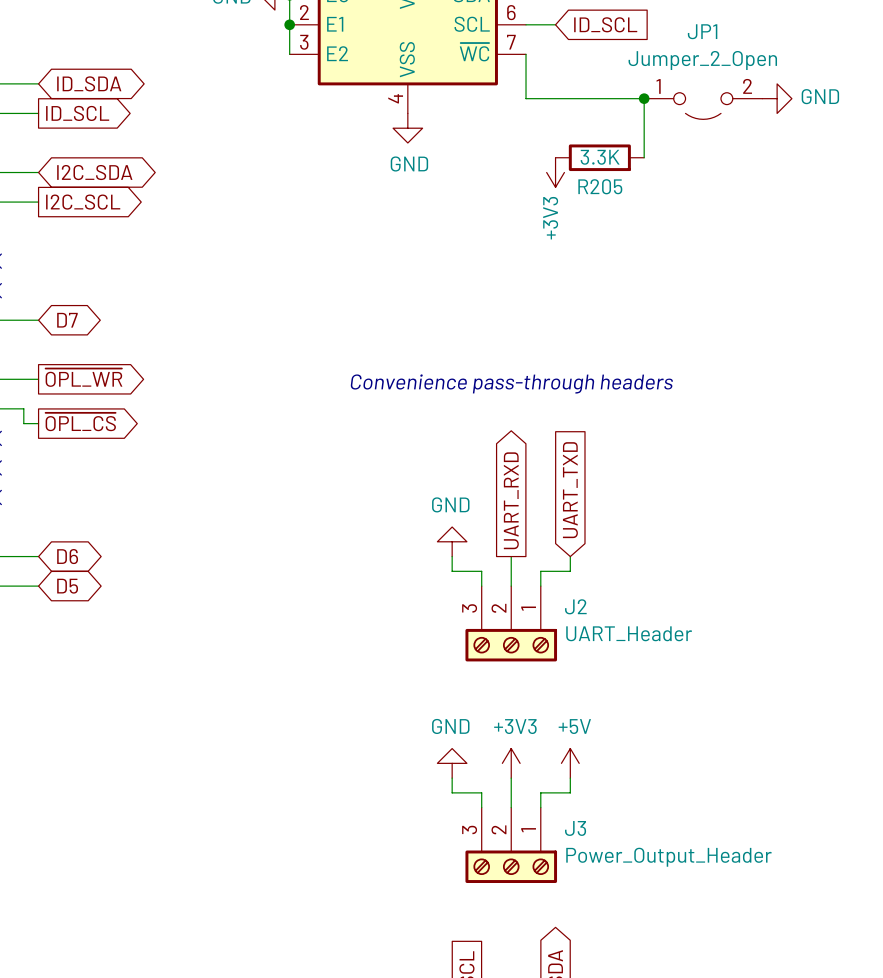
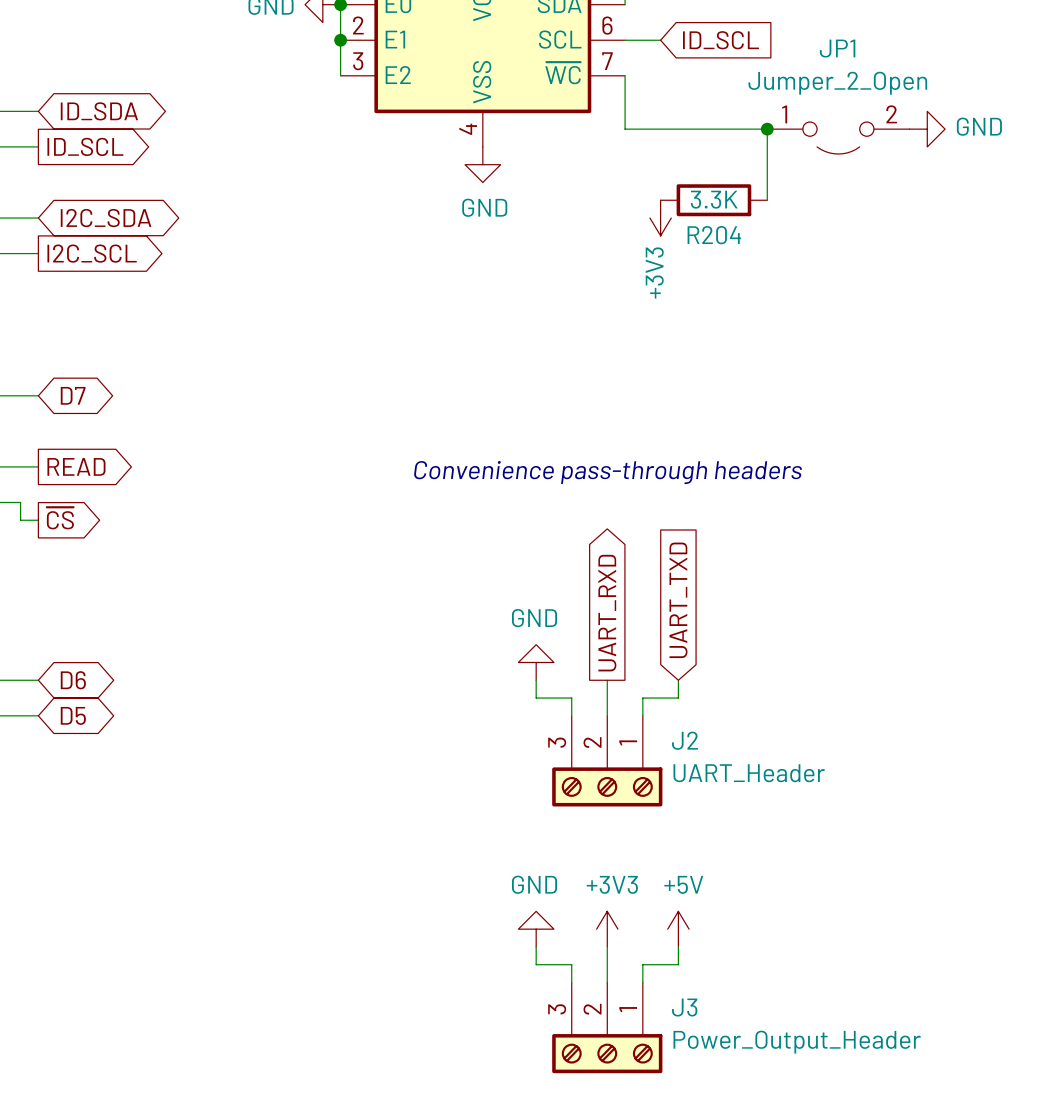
R205 name: R205 (600, 186) -> R204 (714, 235)
global label: ~{OPL_WR} (83, 377) -> READ (76, 466)
global label: ~{OPL_CS} (80, 422) -> ~{CS} (60, 518)

